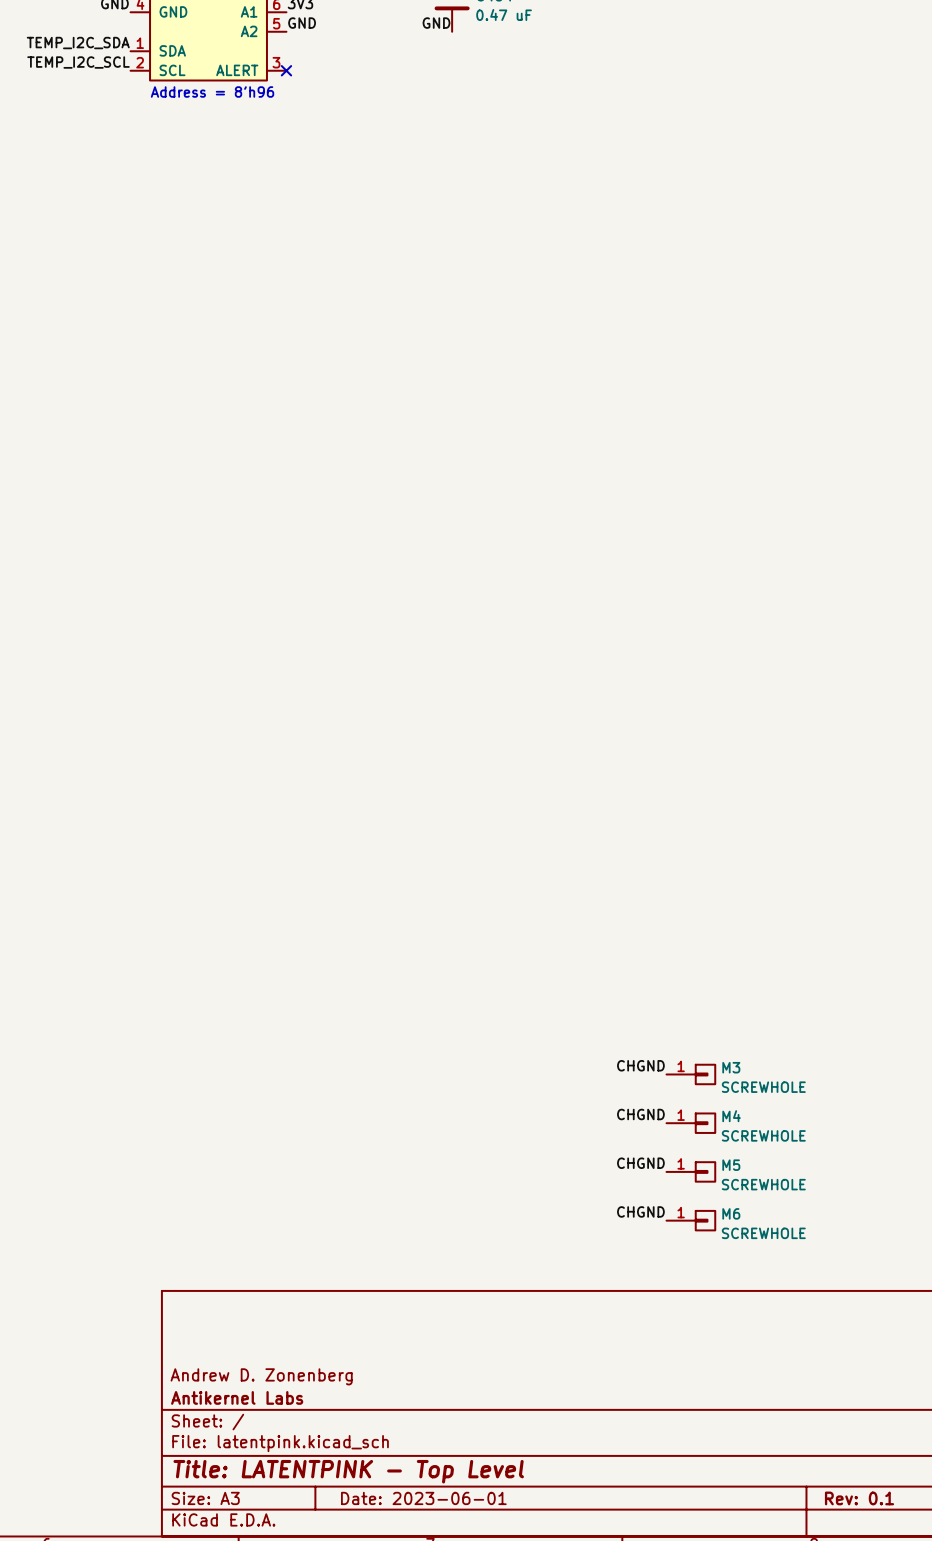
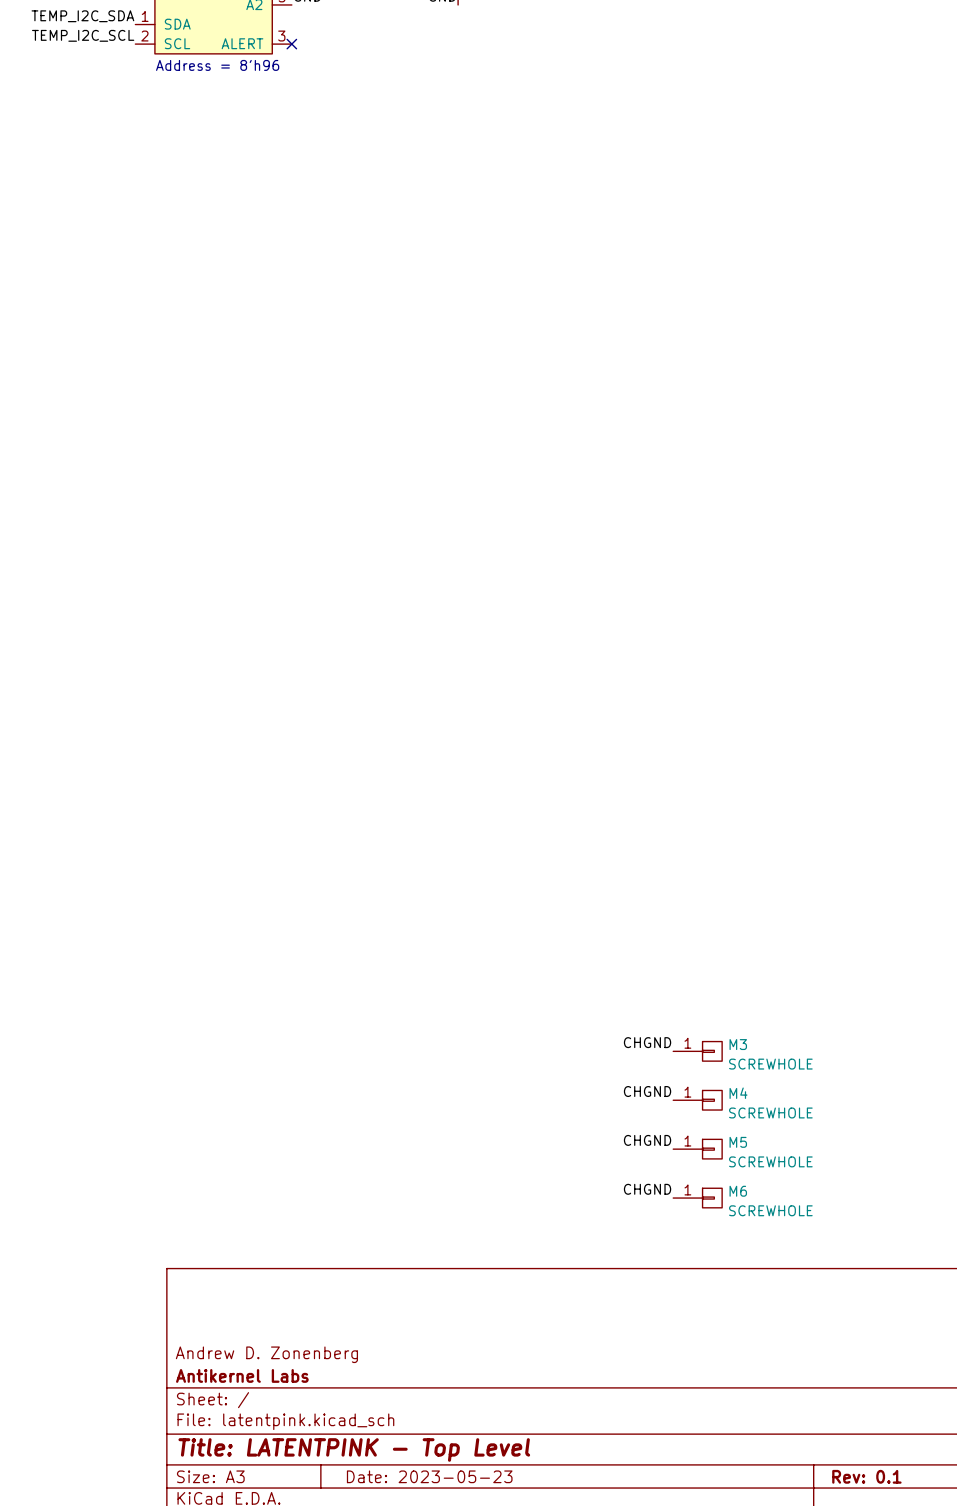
title block: Date: 2023-06-01 (423, 1498) -> Date: 2023-05-23 (429, 1476)

